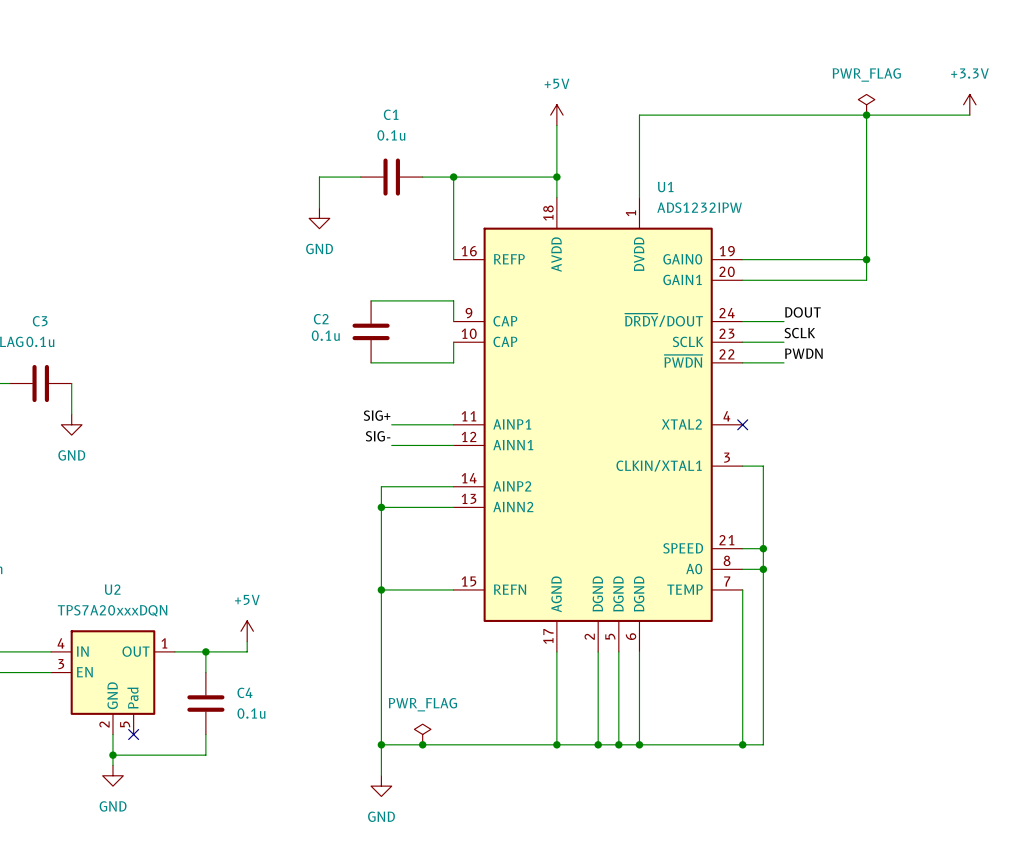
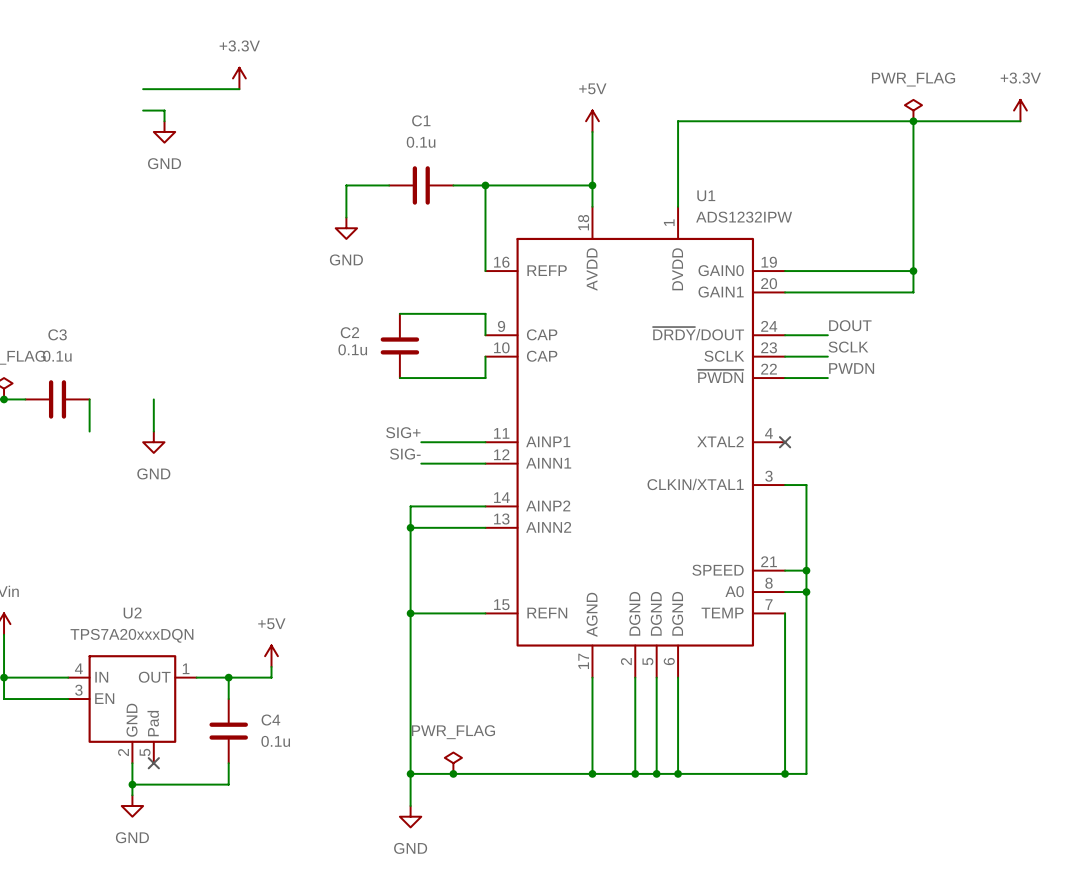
power symbol: none -> +3.3V (239, 78)
wire: none -> (143, 89) (239, 89)
wire: none -> (143, 110) (164, 110) (164, 121)
power symbol: none -> GND (164, 131)
wire: none -> (153, 399) (153, 431)
power symbol position: GND (71, 424) -> GND (153, 442)

